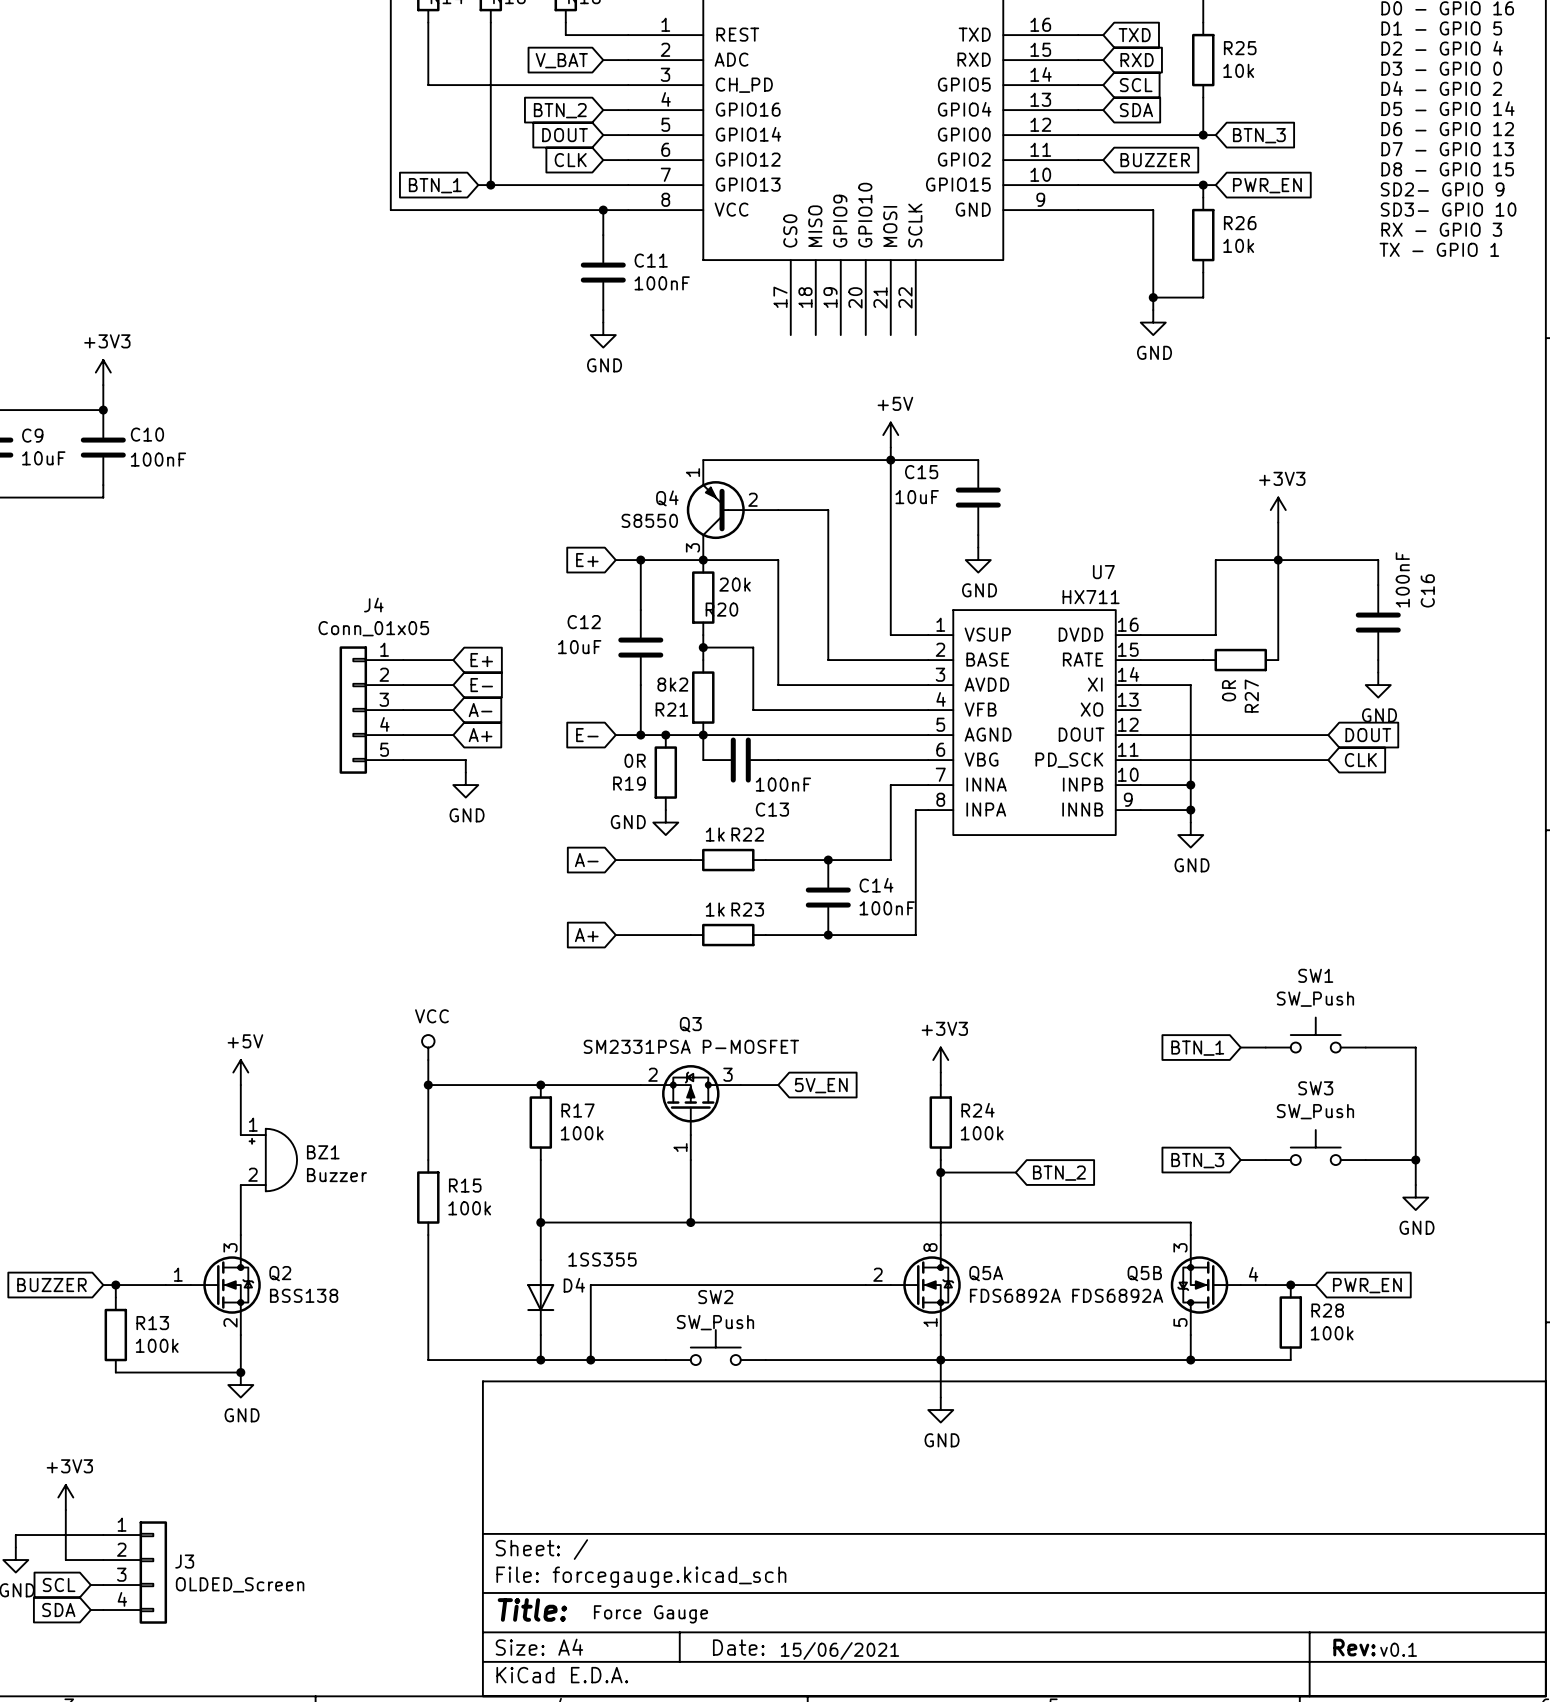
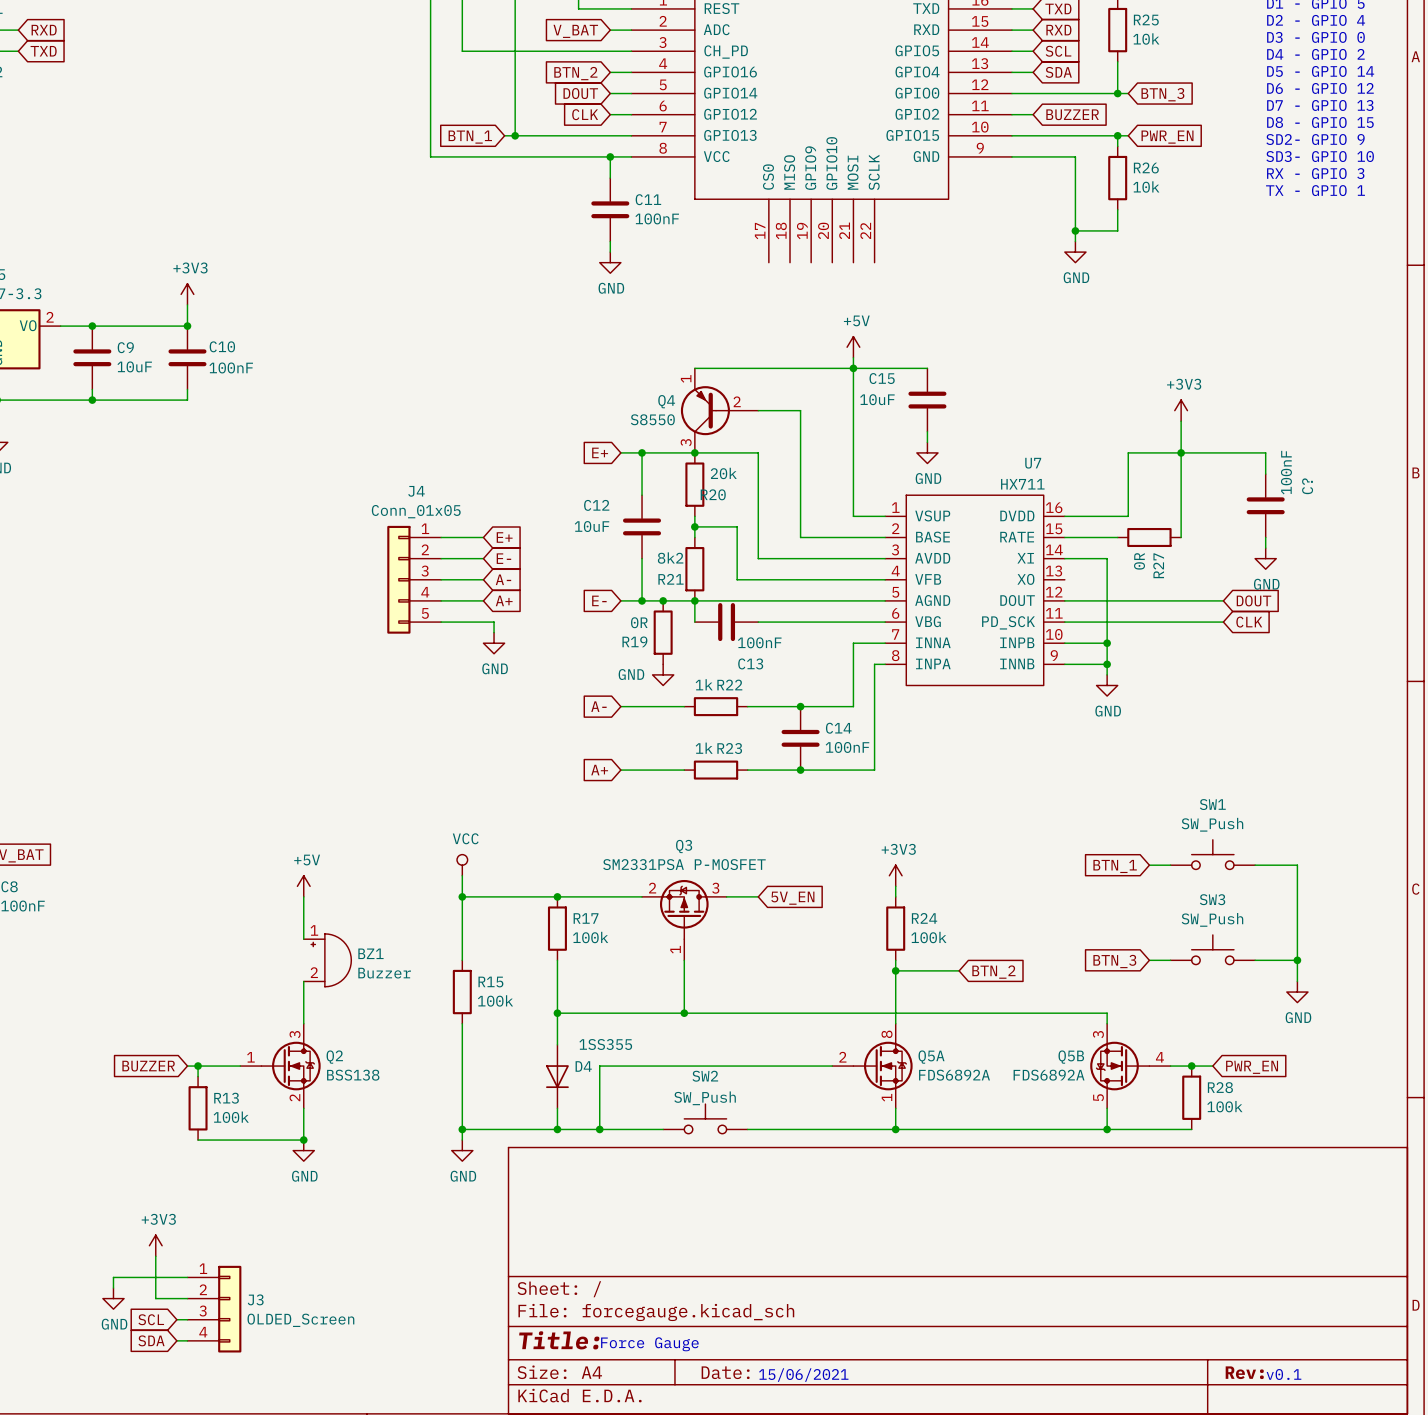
C16 name: C16 (1427, 590) -> C? (1307, 486)
wire: none -> (462, 1129) (462, 1140)
junction: none -> (462, 1129)
wire: (940, 1360) (940, 1397) -> none
power symbol: none -> GND (462, 1150)
power symbol: GND (940, 1410) -> none

